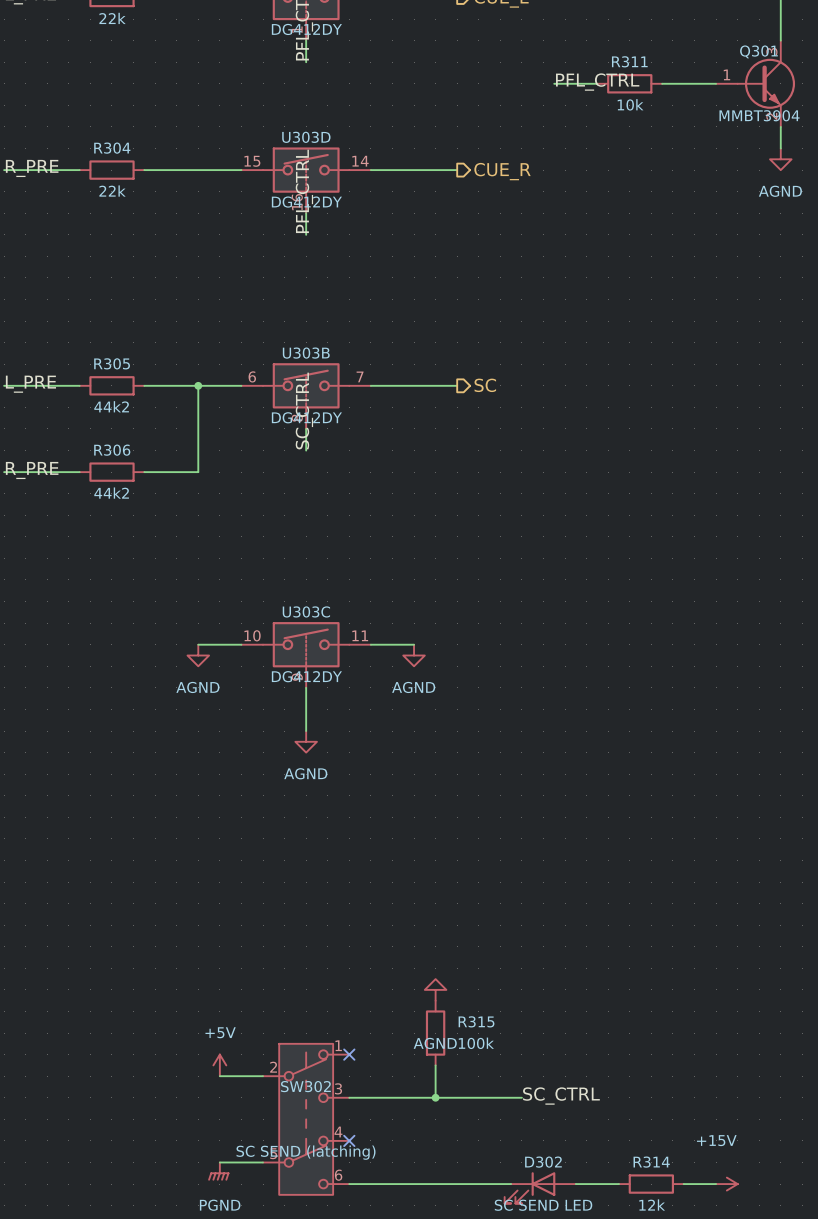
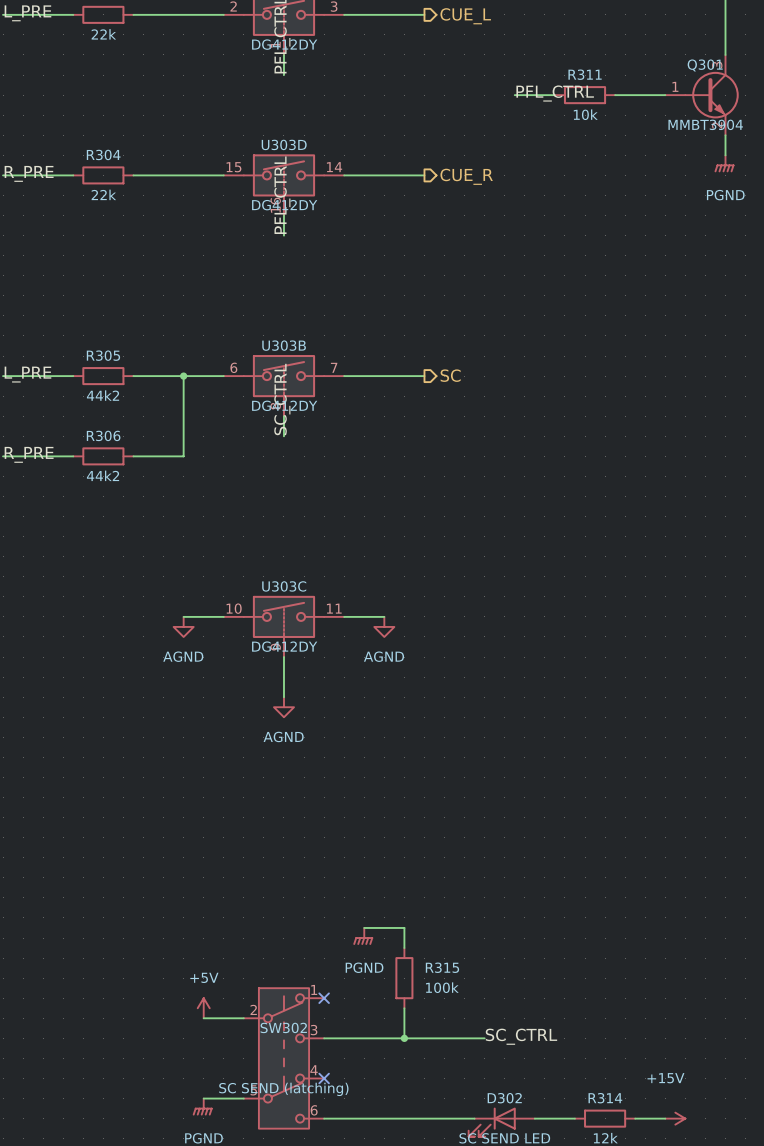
power symbol: AGND (780, 159) -> PGND (724, 163)
wire: none -> (364, 927) (404, 927) (404, 948)
power symbol: none -> PGND (363, 936)
power symbol: AGND (435, 989) -> none

